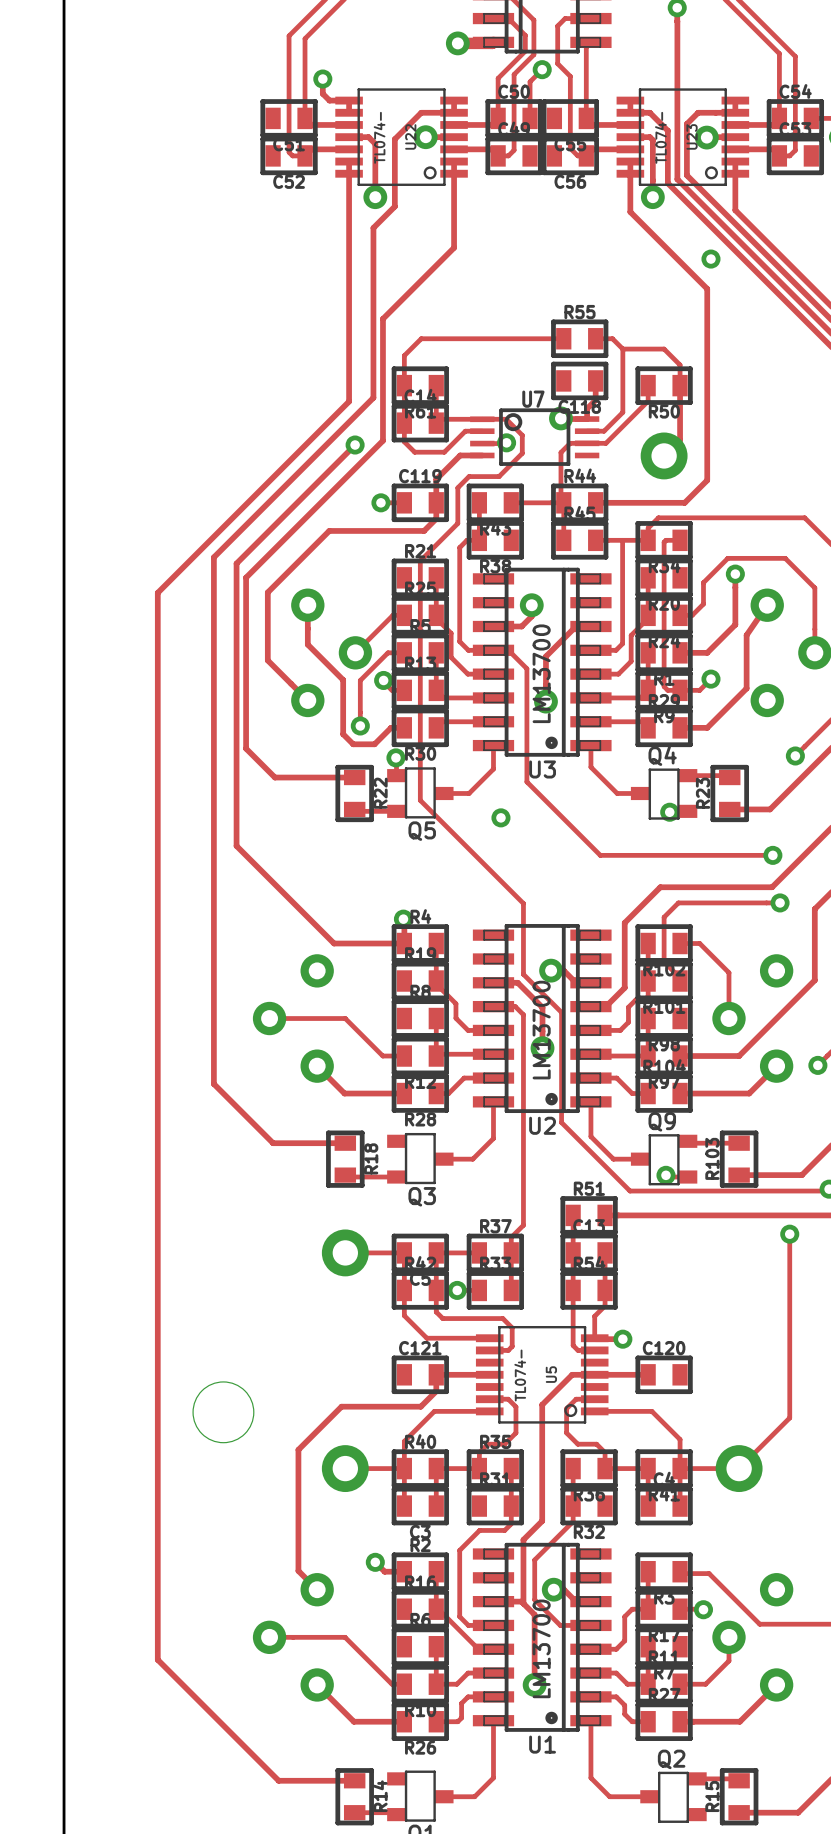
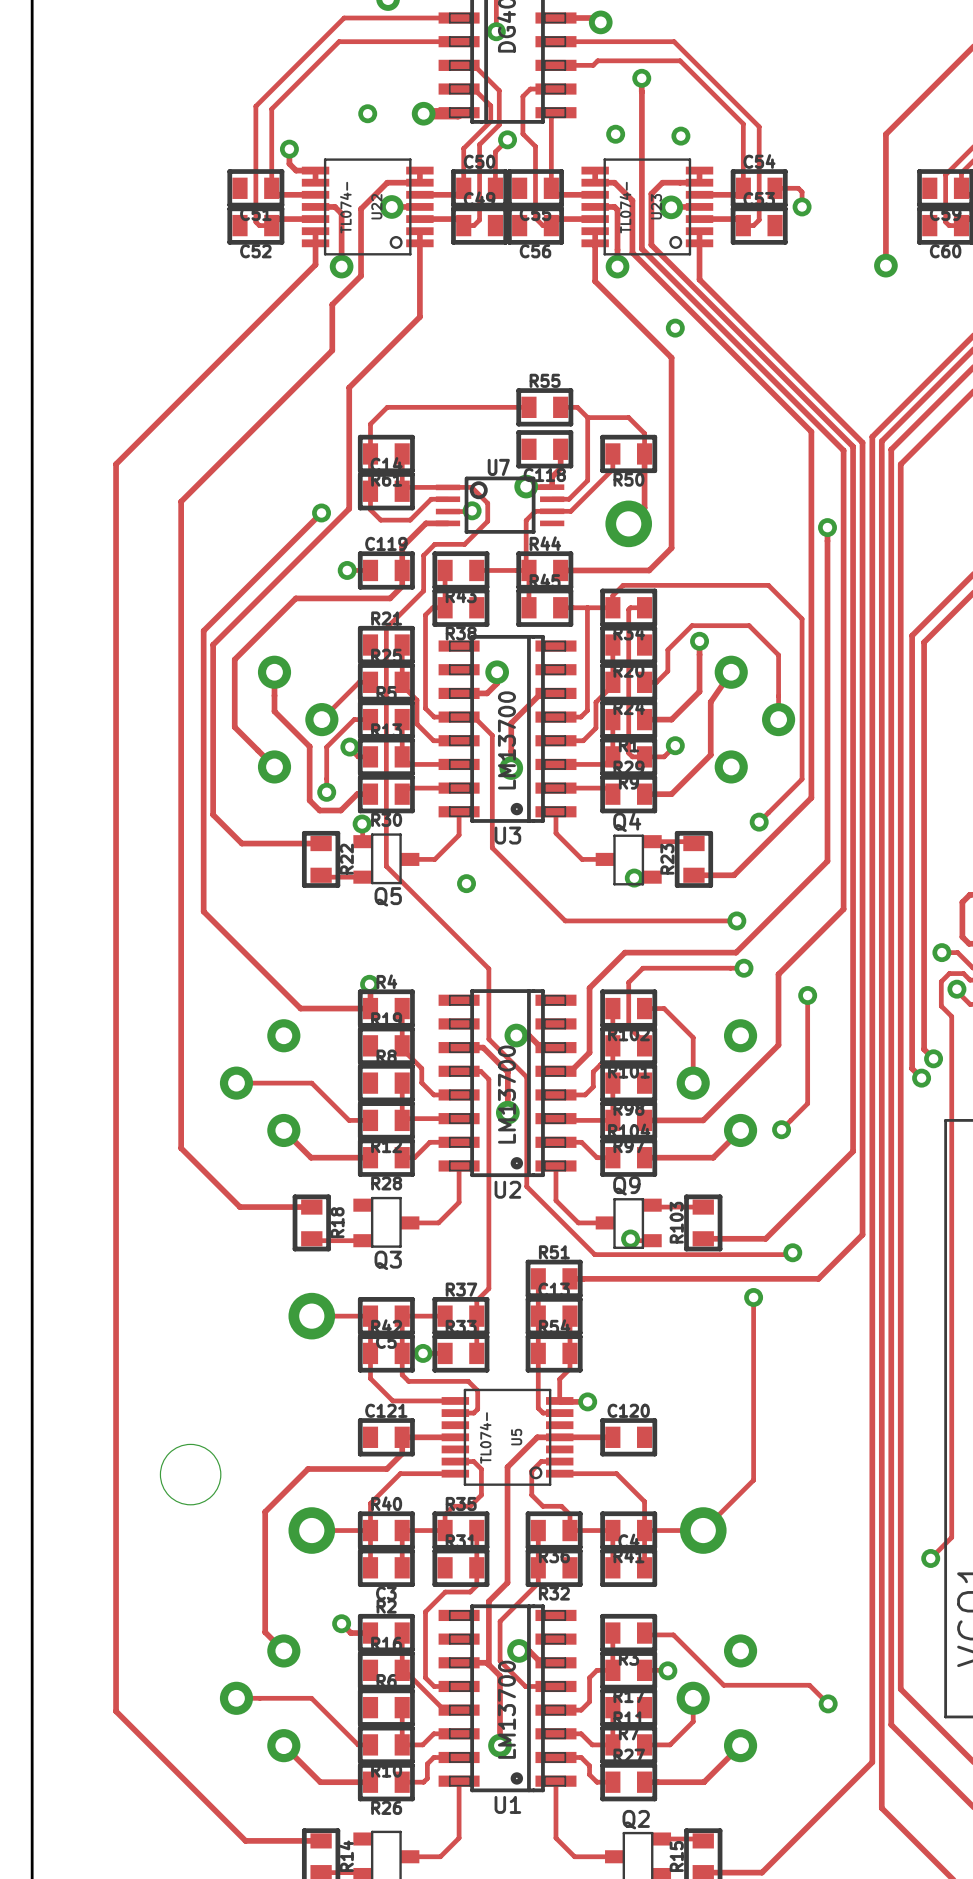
via: none -> (367, 113)
via: none -> (615, 134)
via: none -> (680, 136)
track: (349, 195) (349, 401) (157, 592) (157, 1659) -> (315, 264) (116, 464) (116, 1711) (125, 1720)
track: (373, 227) (373, 397) (213, 557) -> (339, 297) (332, 304) (332, 350) (181, 501) (181, 624)

